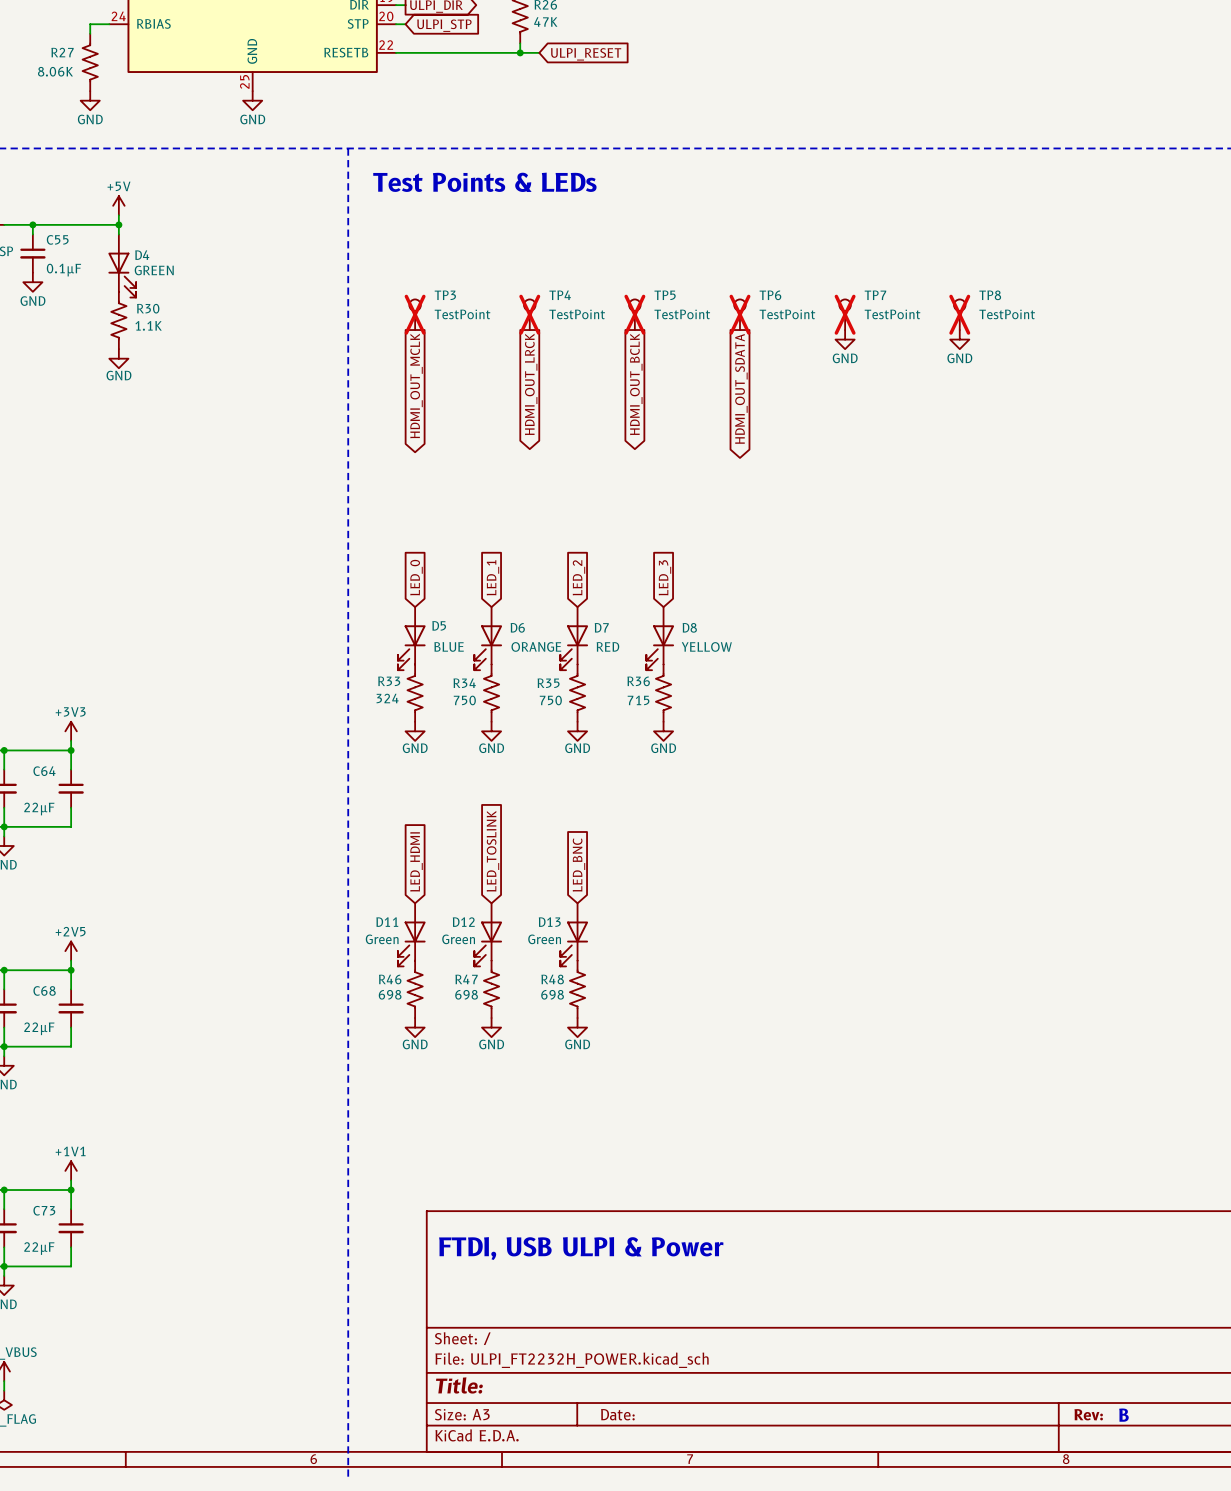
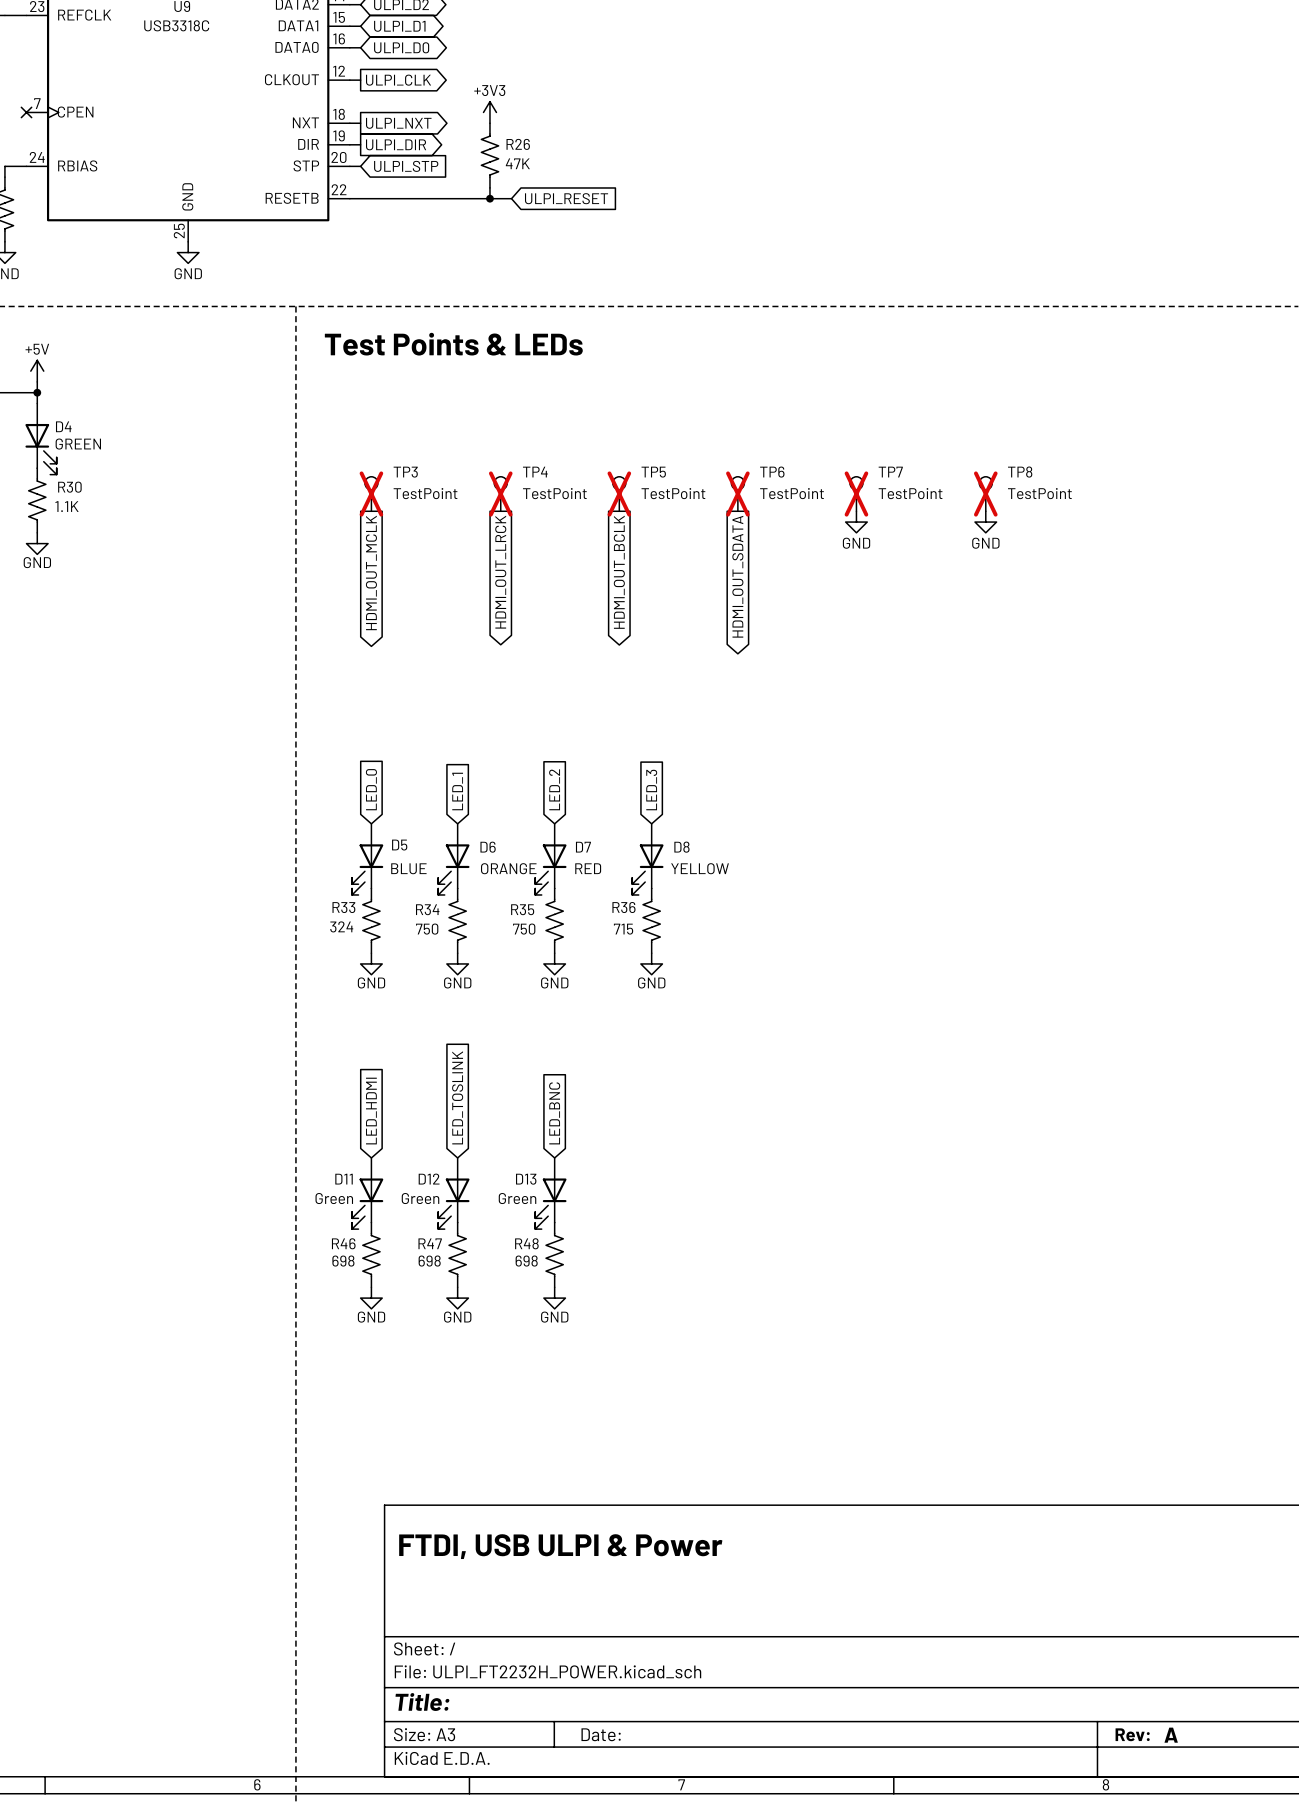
text: B (1123, 1415) -> A (1171, 1735)

